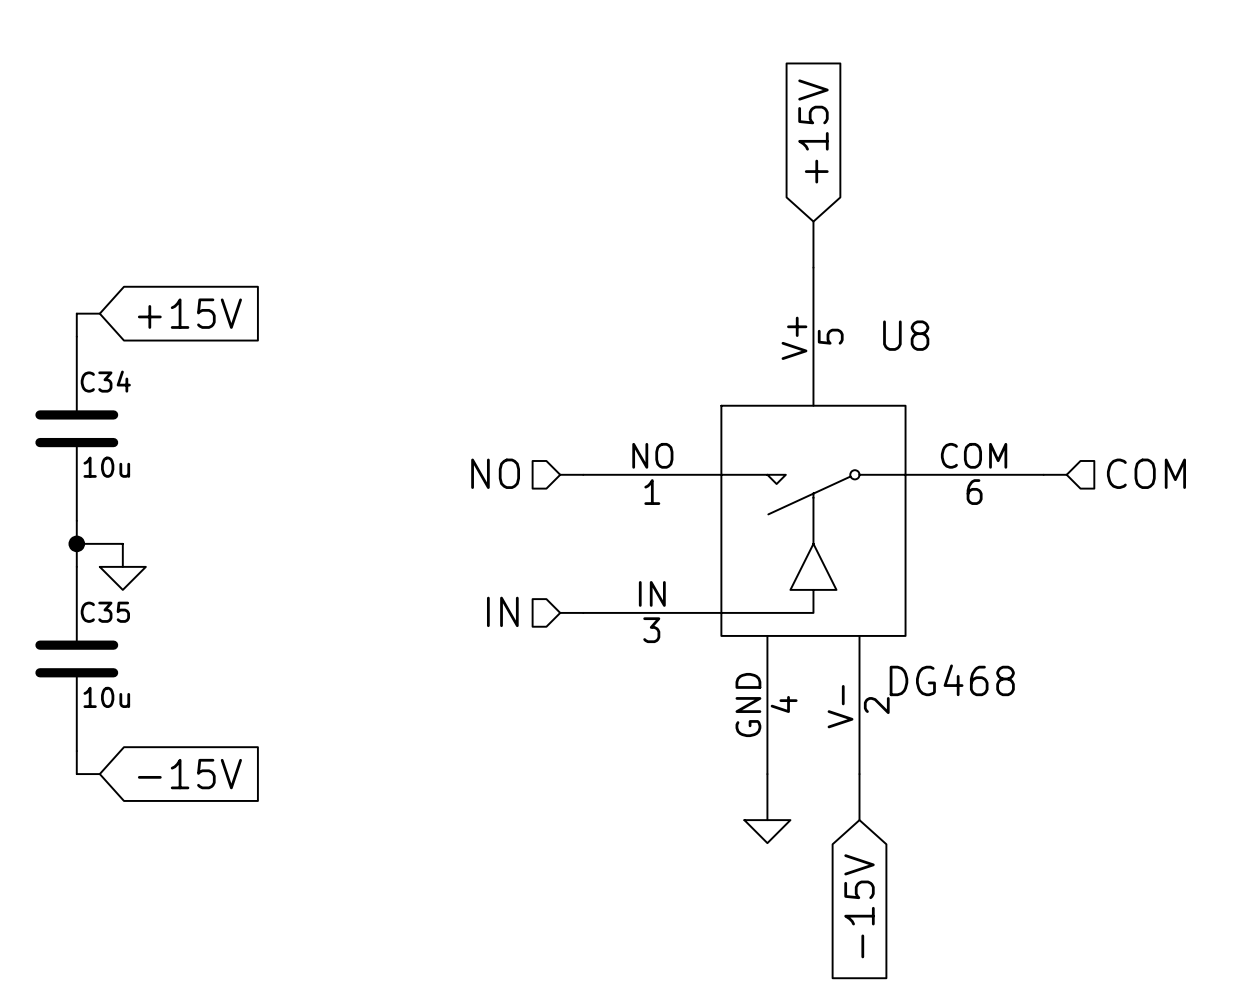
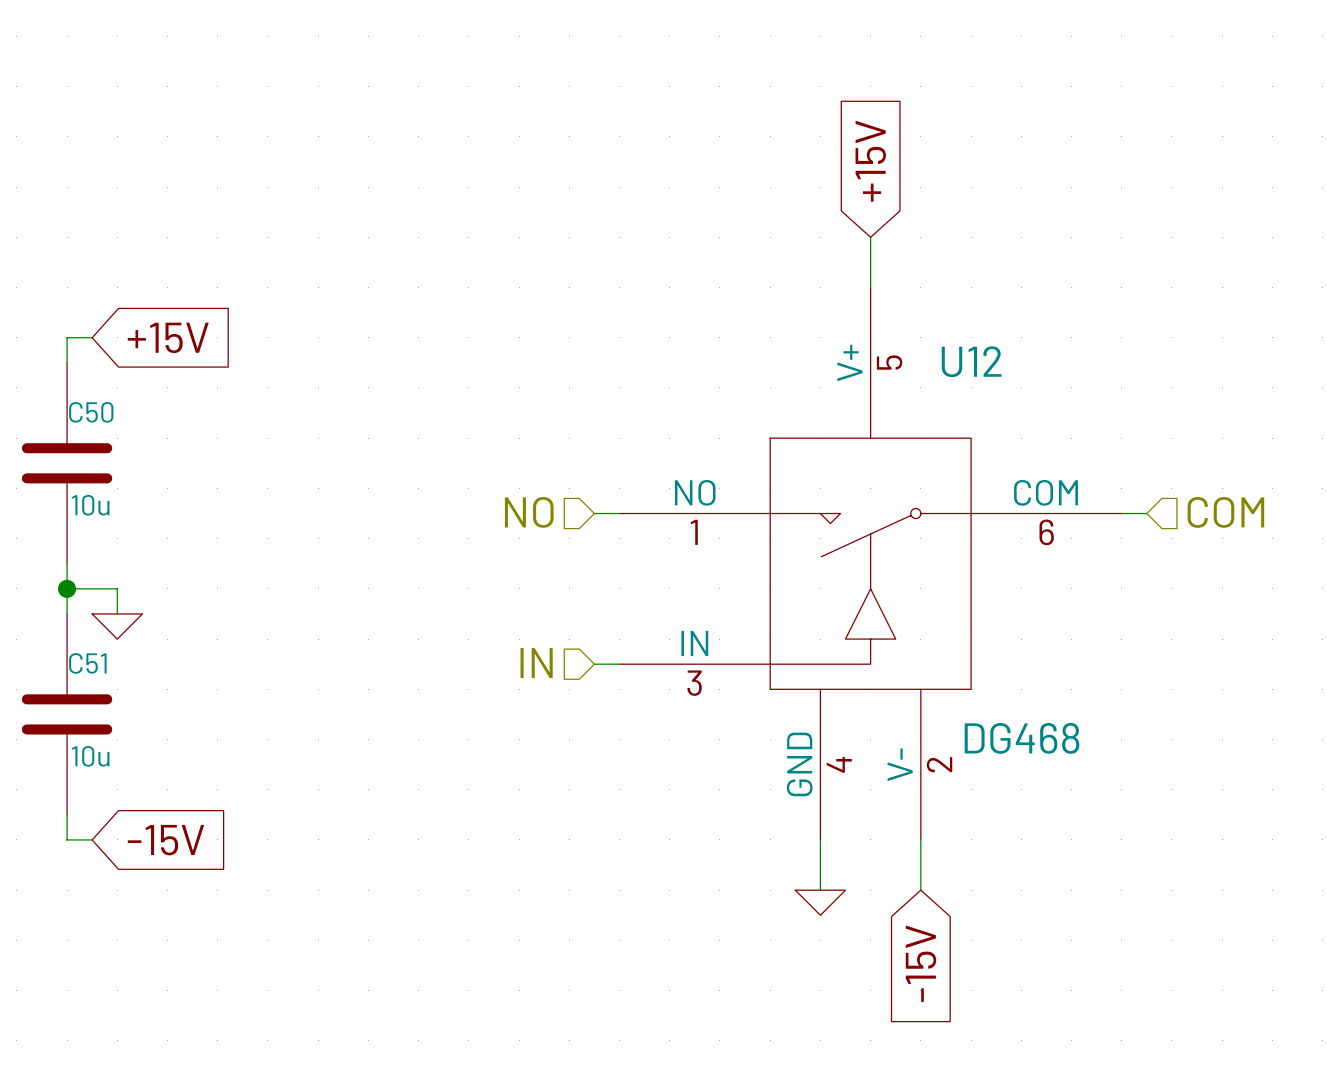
U8 name: U8 (906, 335) -> U12 (971, 361)
C34 name: C34 (105, 381) -> C50 (91, 412)
C35 name: C35 (105, 612) -> C51 (87, 663)

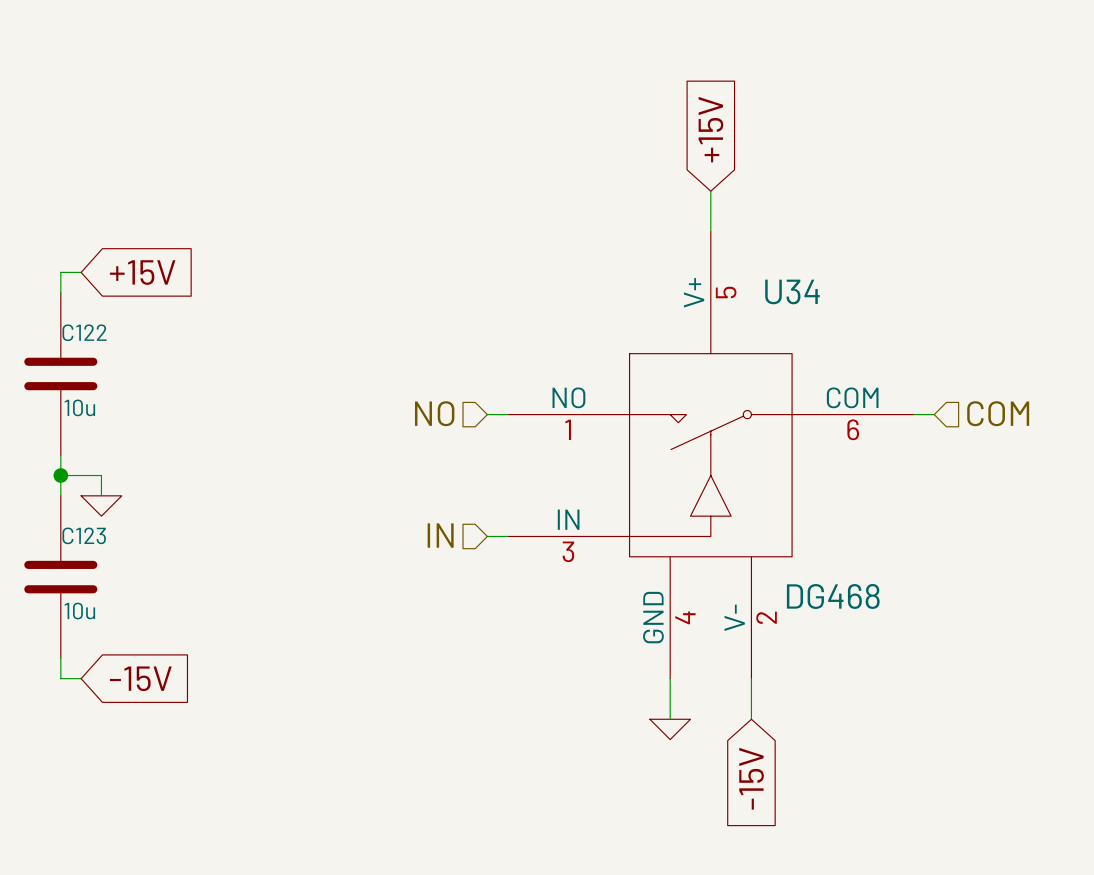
U12 name: U12 (971, 361) -> U34 (792, 291)
C50 name: C50 (91, 412) -> C122 (84, 332)
C51 name: C51 (87, 663) -> C123 (84, 535)

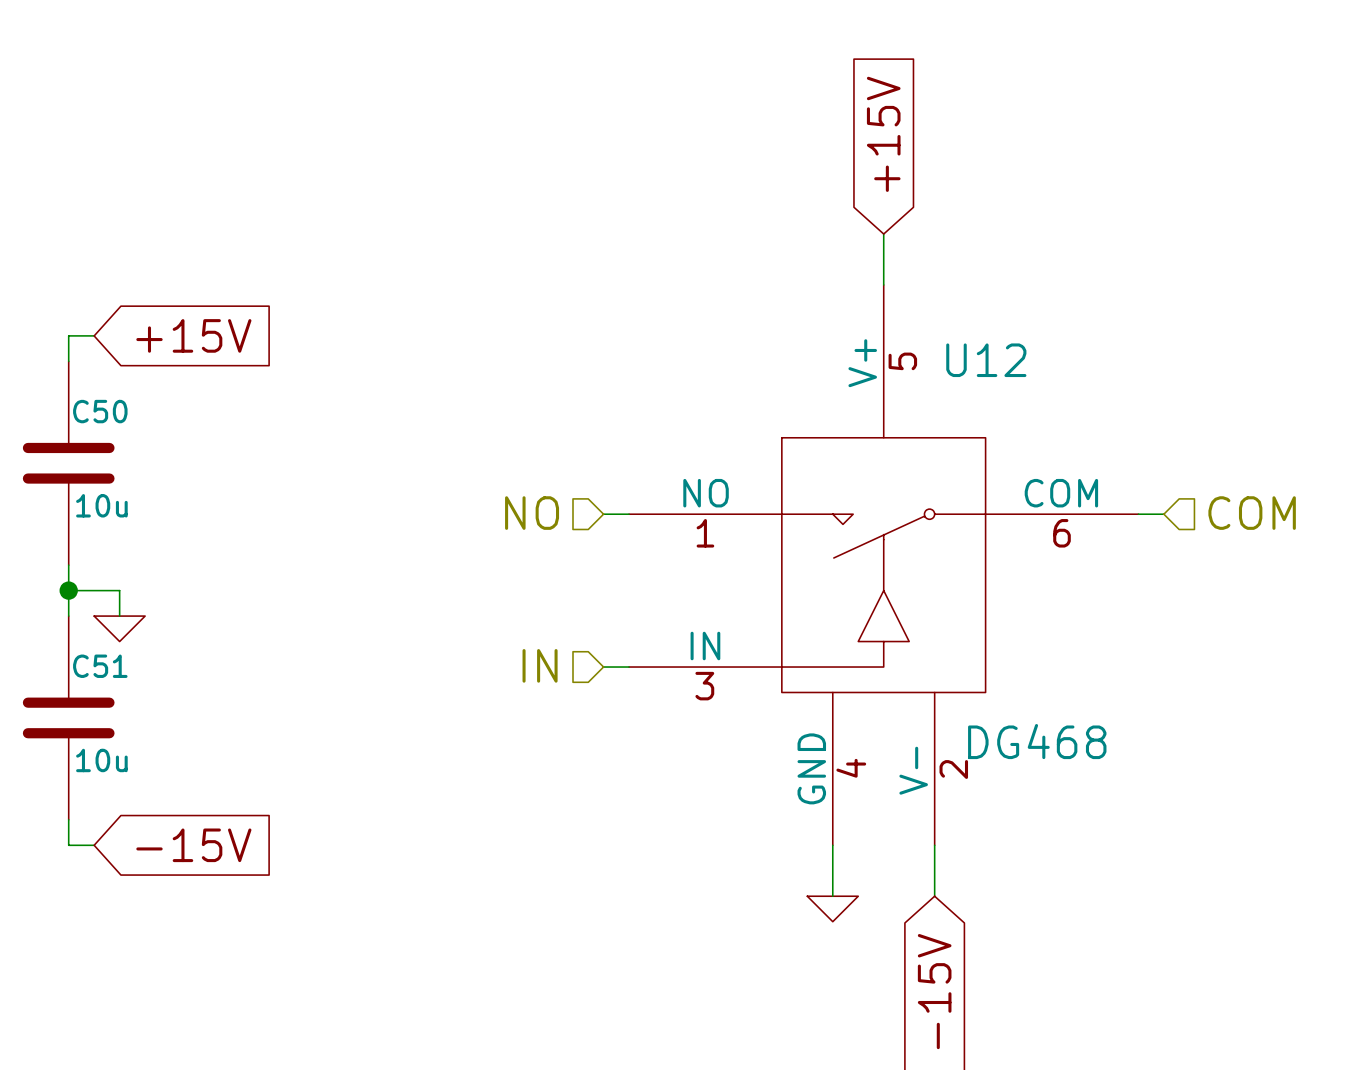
U34 name: U34 (792, 291) -> U12 (986, 360)
C122 name: C122 (84, 332) -> C50 (100, 411)
C123 name: C123 (84, 535) -> C51 (100, 666)

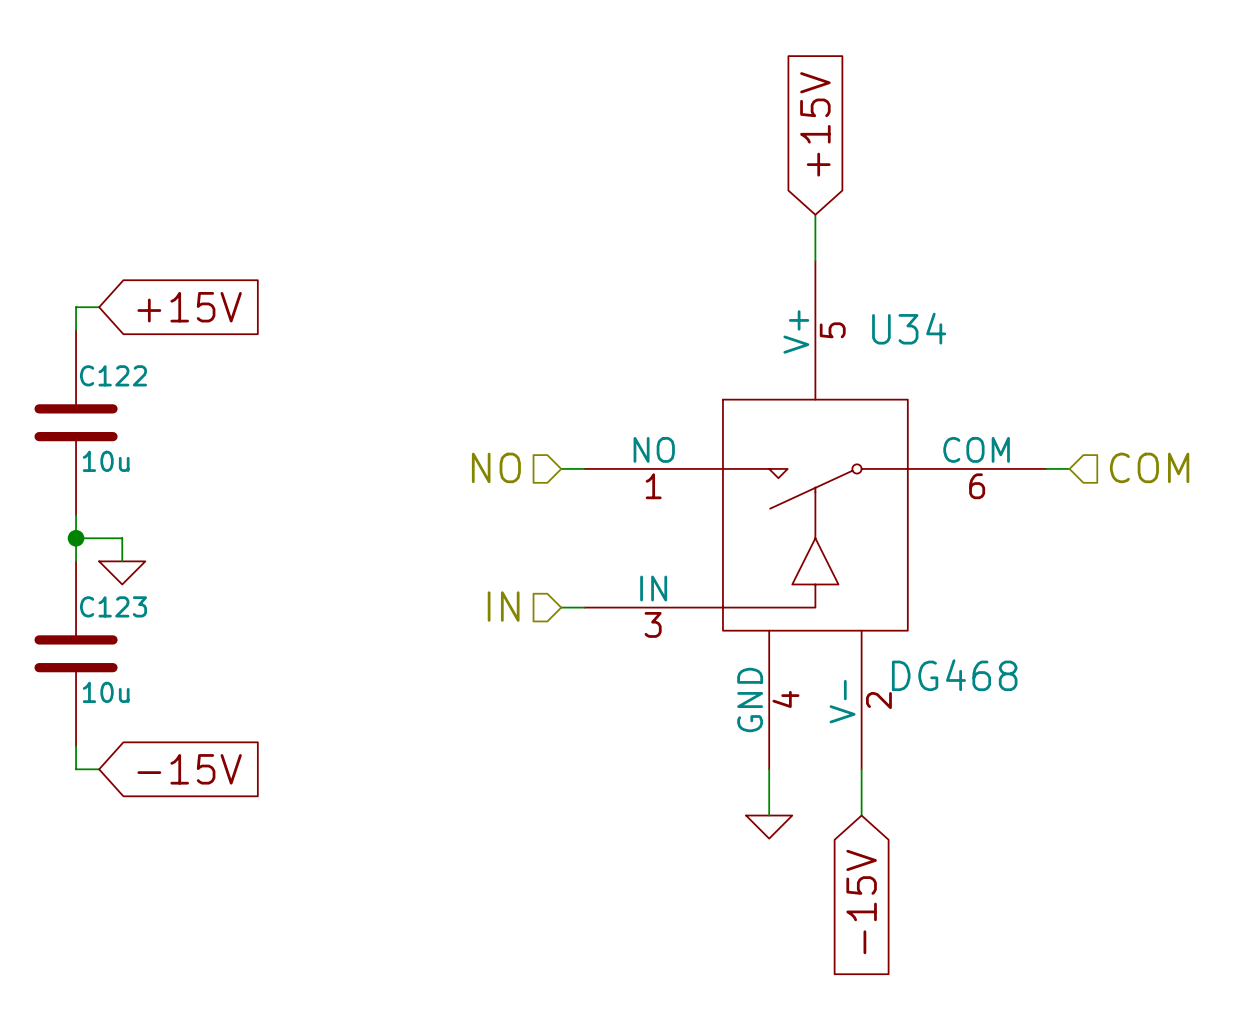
U12 name: U12 (986, 360) -> U34 (909, 328)
C50 name: C50 (100, 411) -> C122 (113, 375)
C51 name: C51 (100, 666) -> C123 (113, 606)

